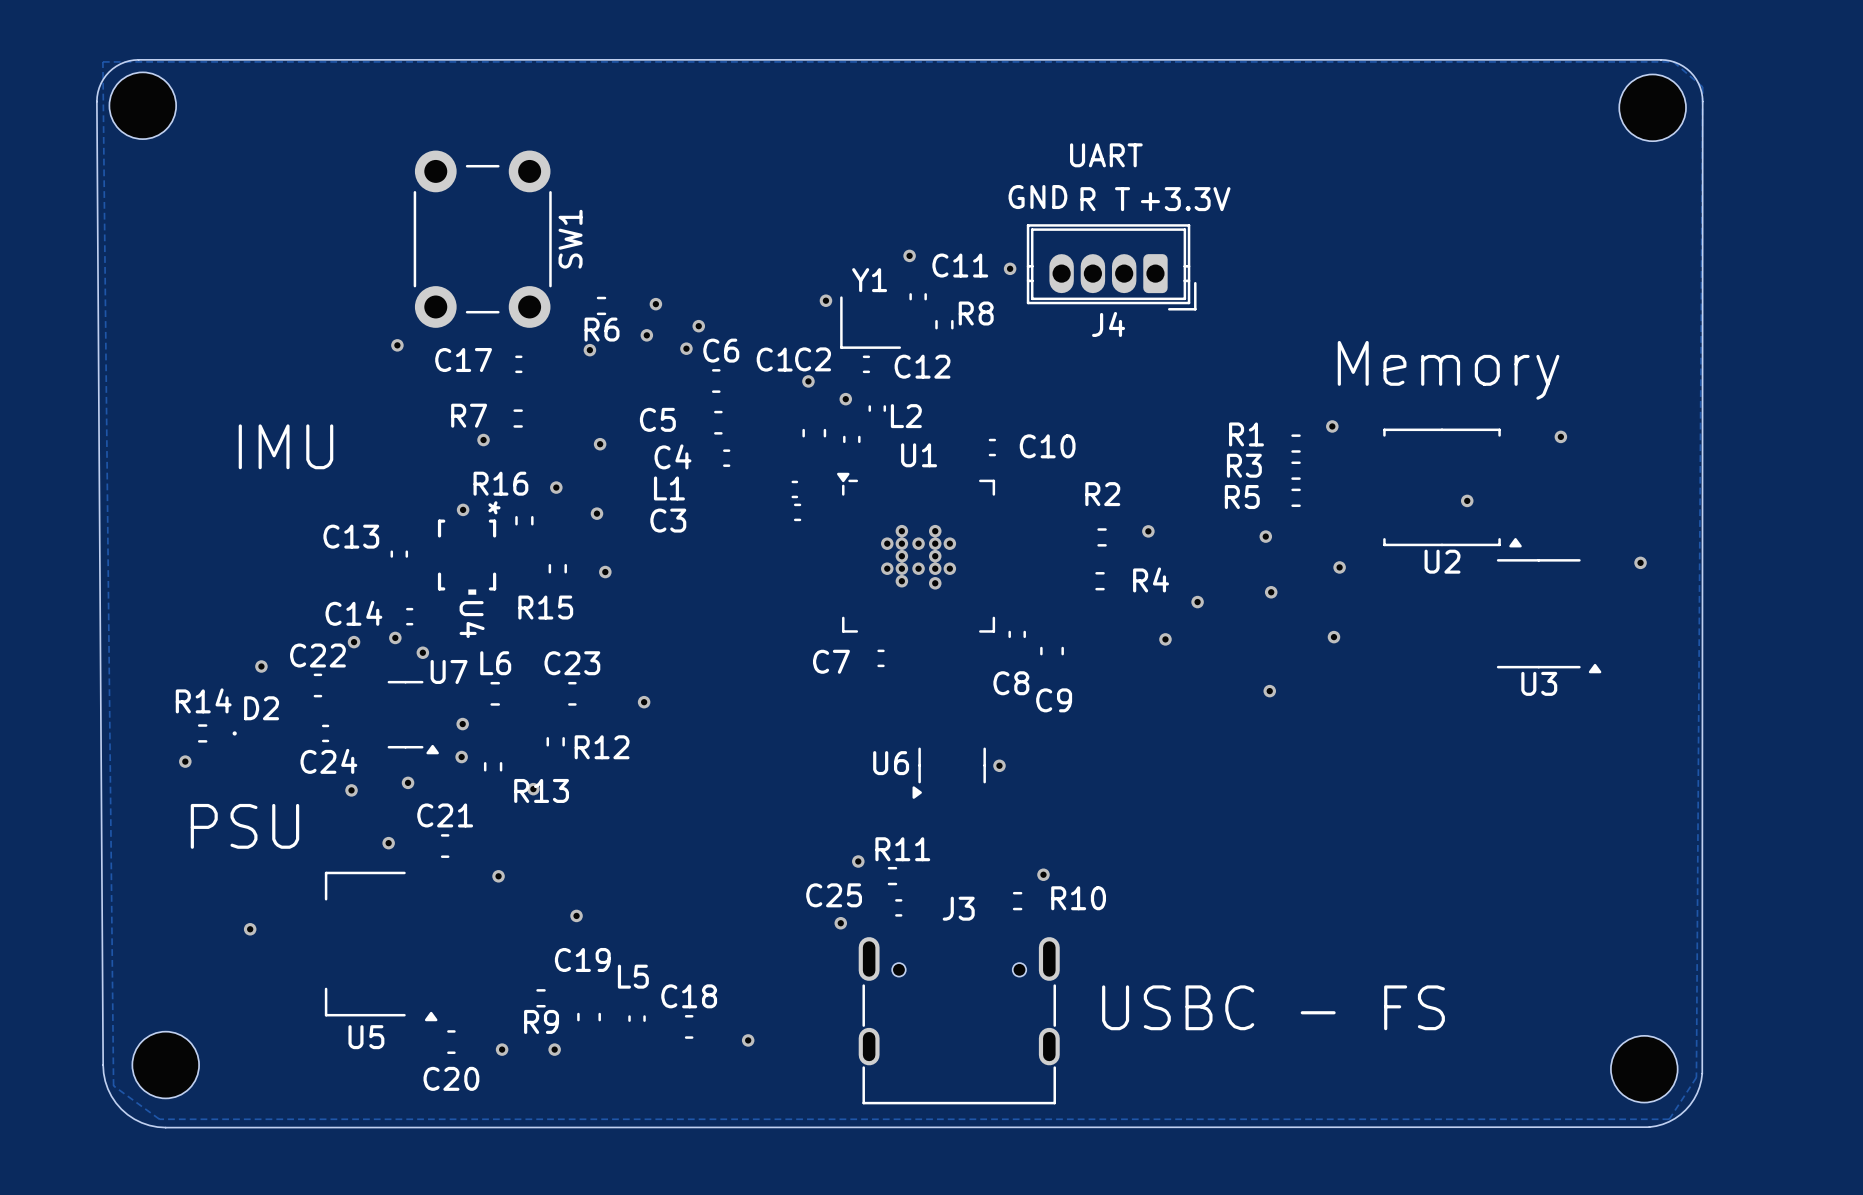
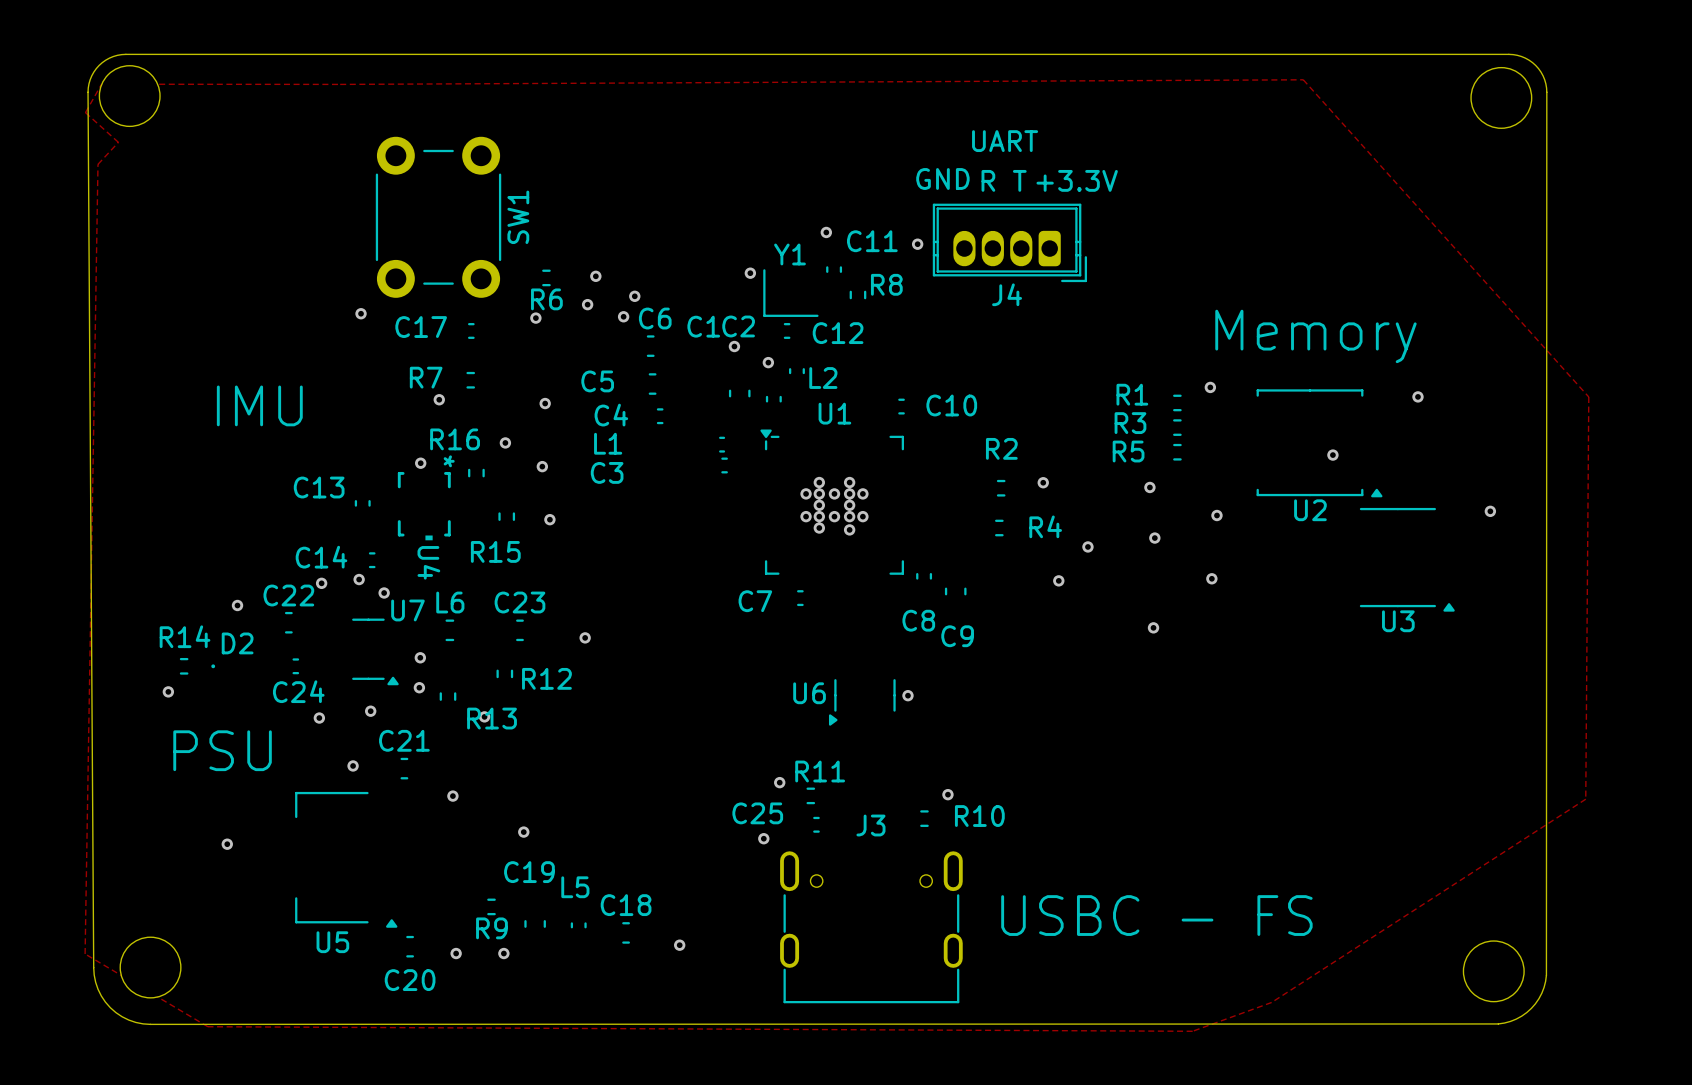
zone outline: (102, 61) (1673, 61) (1702, 86) (1696, 1077) (1669, 1119) (159, 1119) (113, 1085) (102, 61) -> (1303, 79) (101, 84) (85, 112) (118, 142) (97, 164) (85, 953) (207, 1026) (1192, 1031) (1271, 1002) (1585, 799) (1588, 396) (1303, 79)

